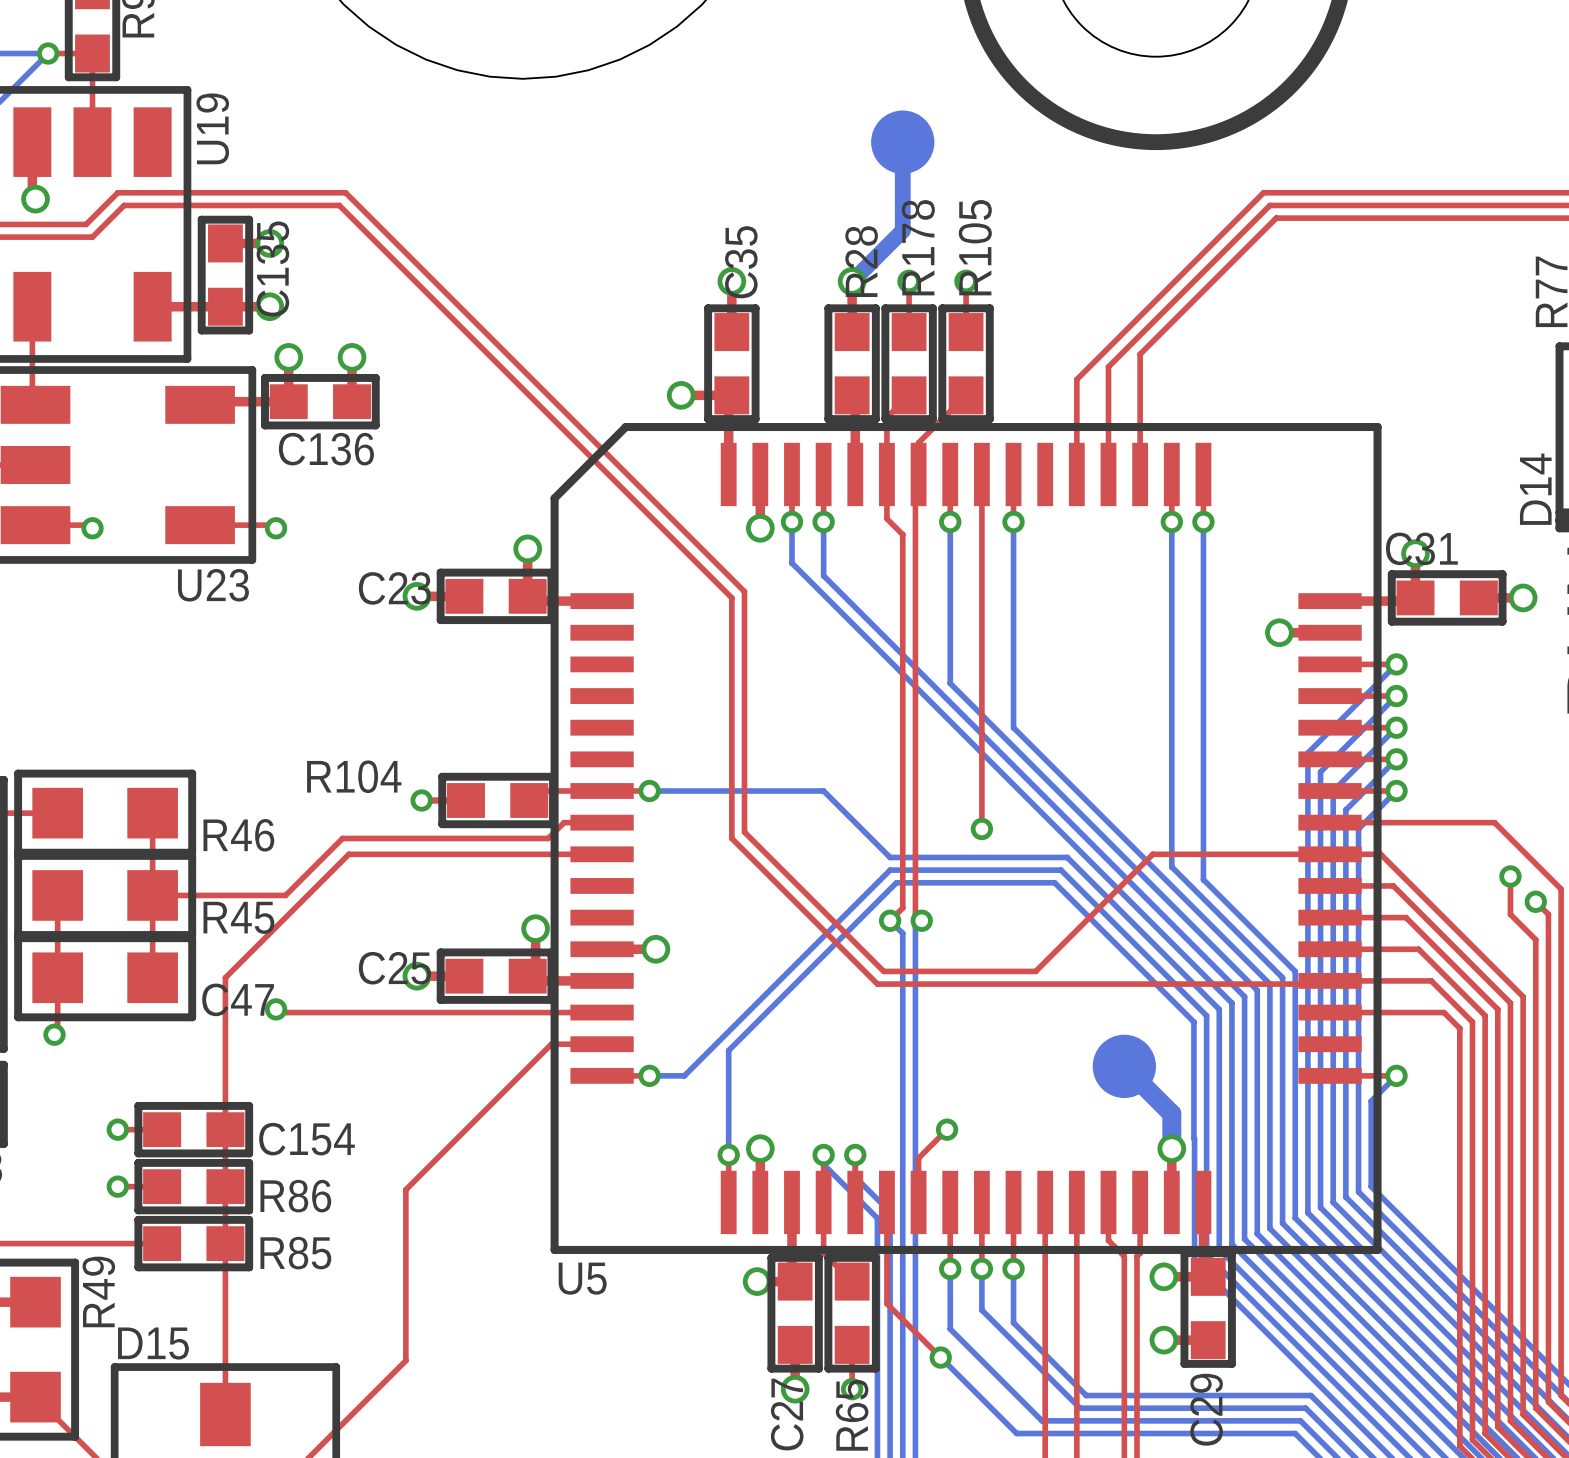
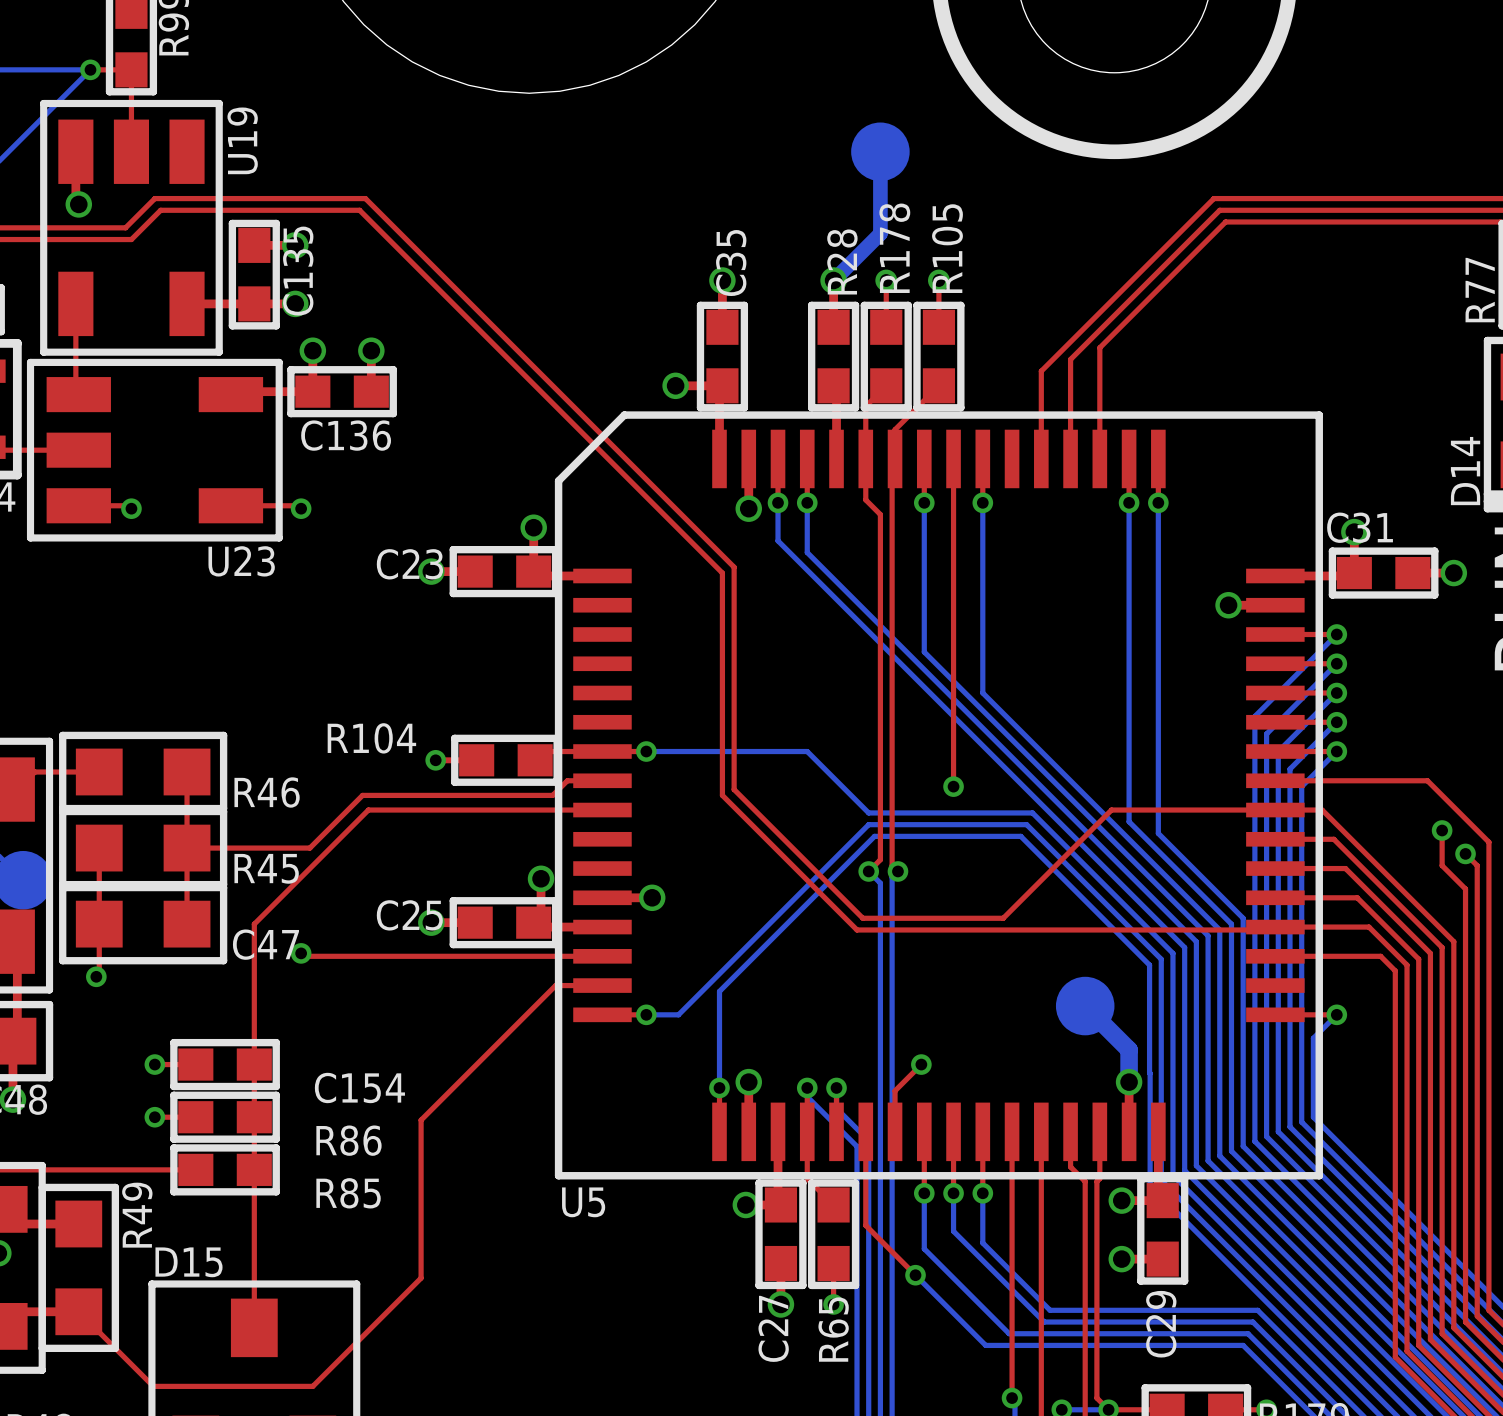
C154 name position: C154 (307, 1139) -> C154 (359, 1087)
R86 name position: R86 (295, 1196) -> R86 (349, 1140)
R85 name position: R85 (295, 1253) -> R85 (348, 1193)

